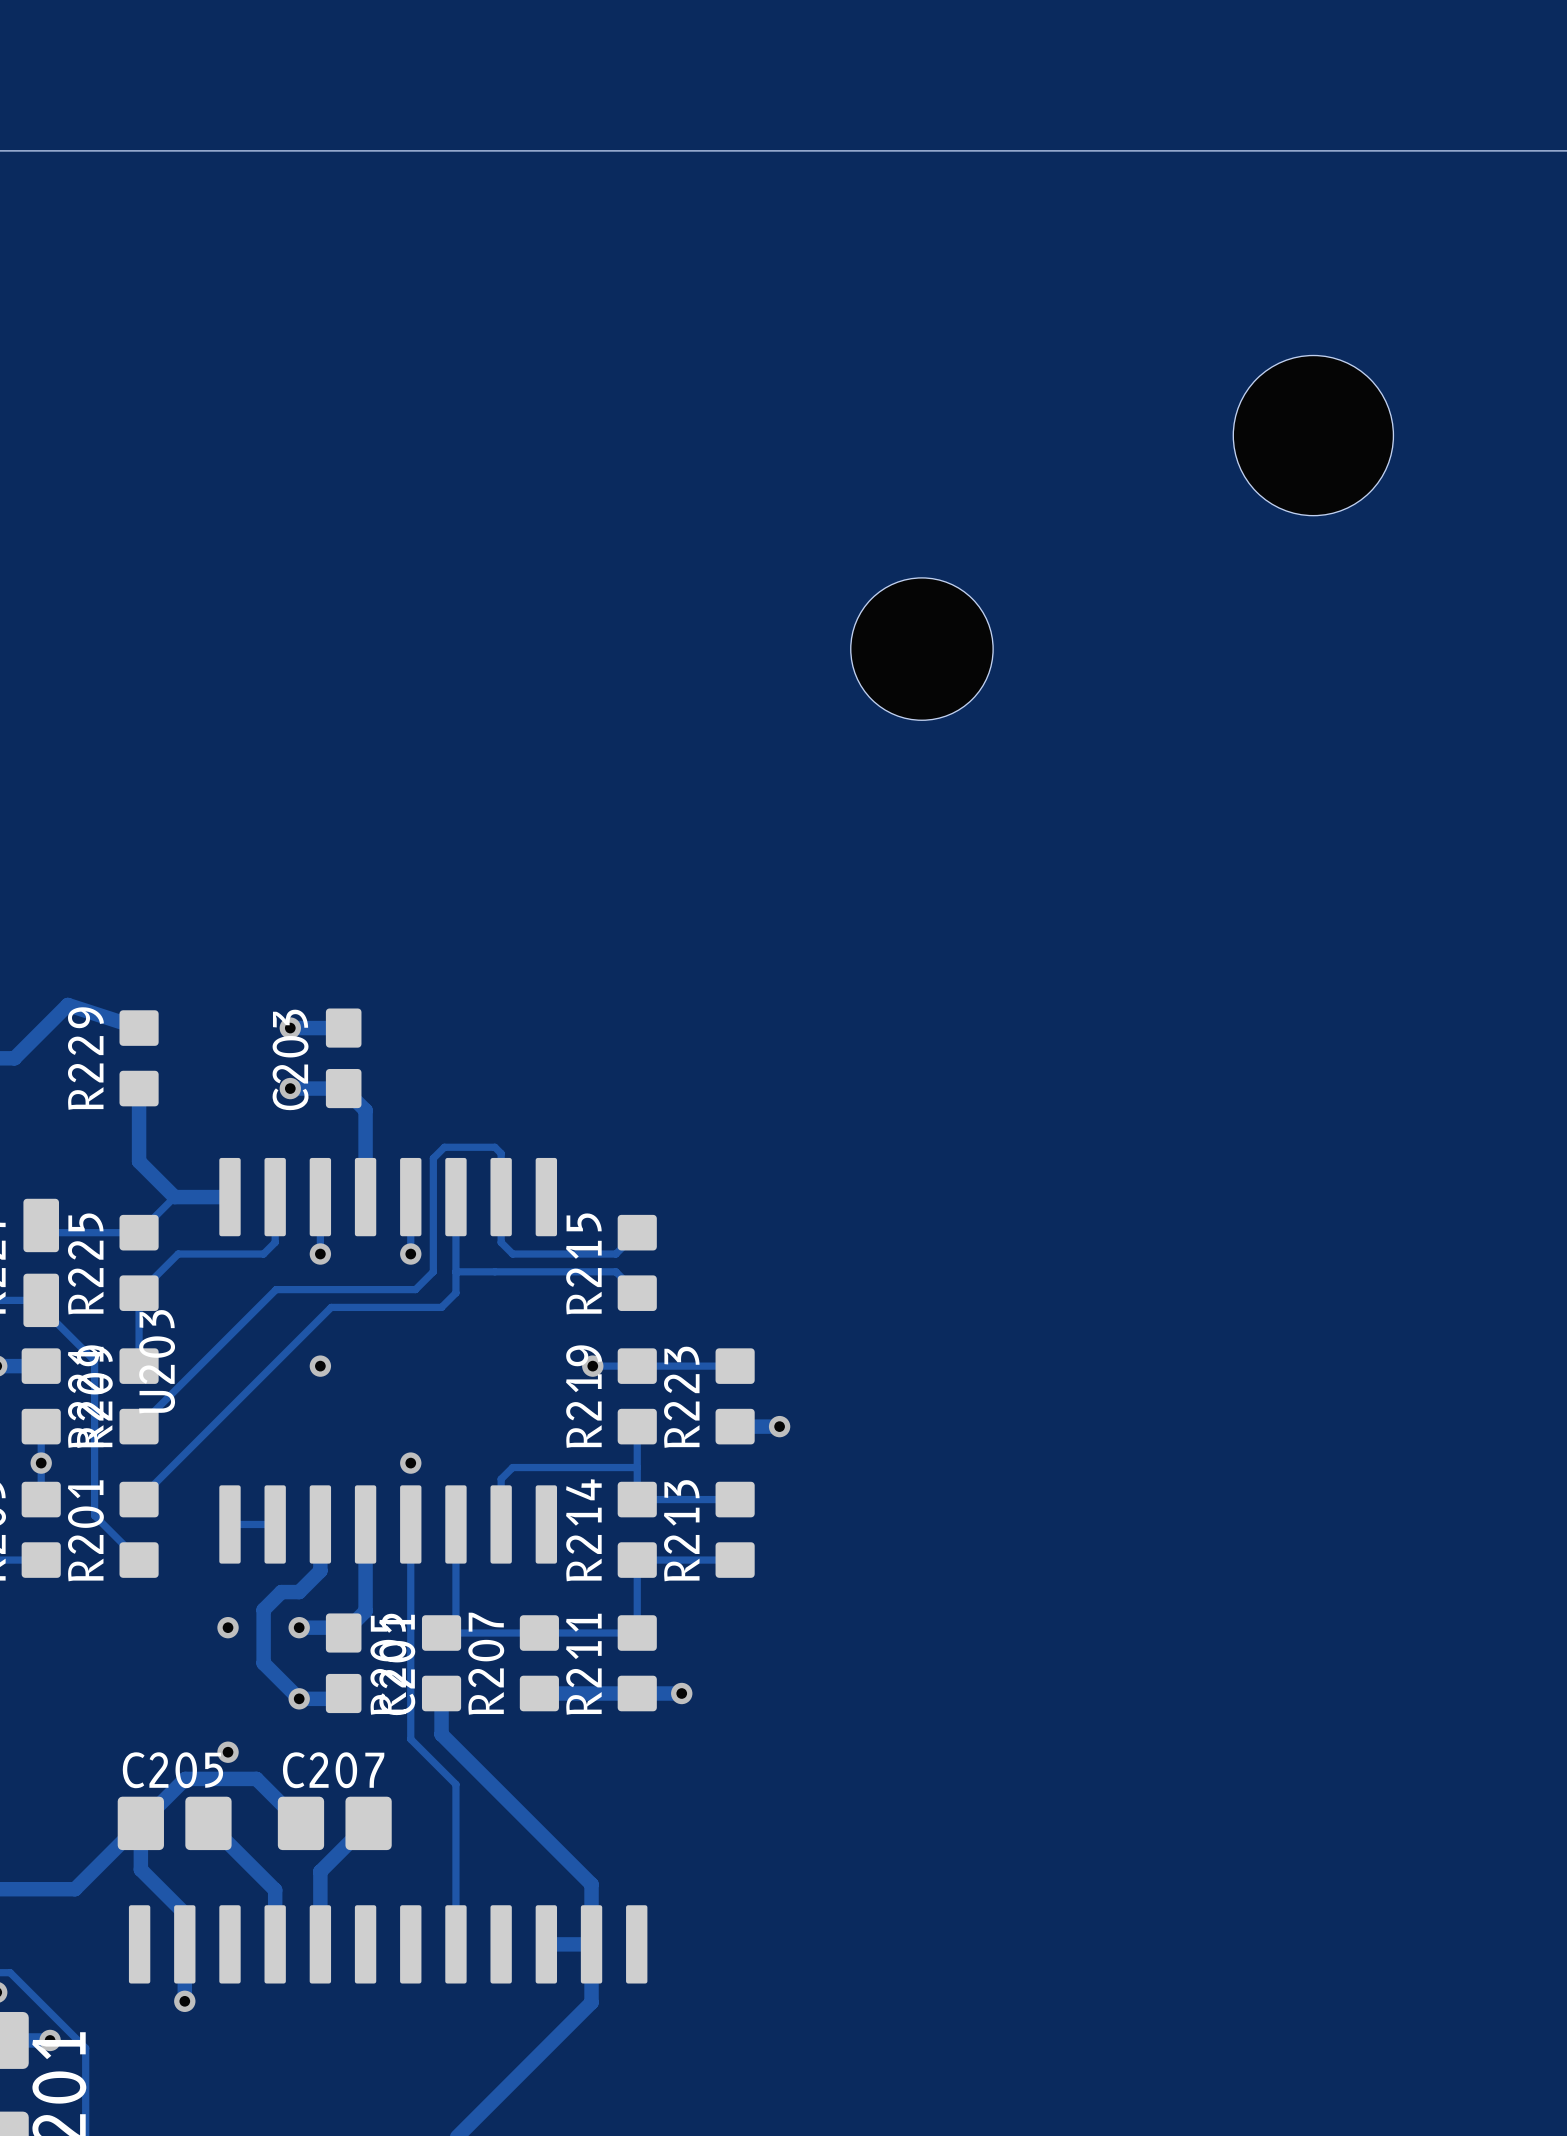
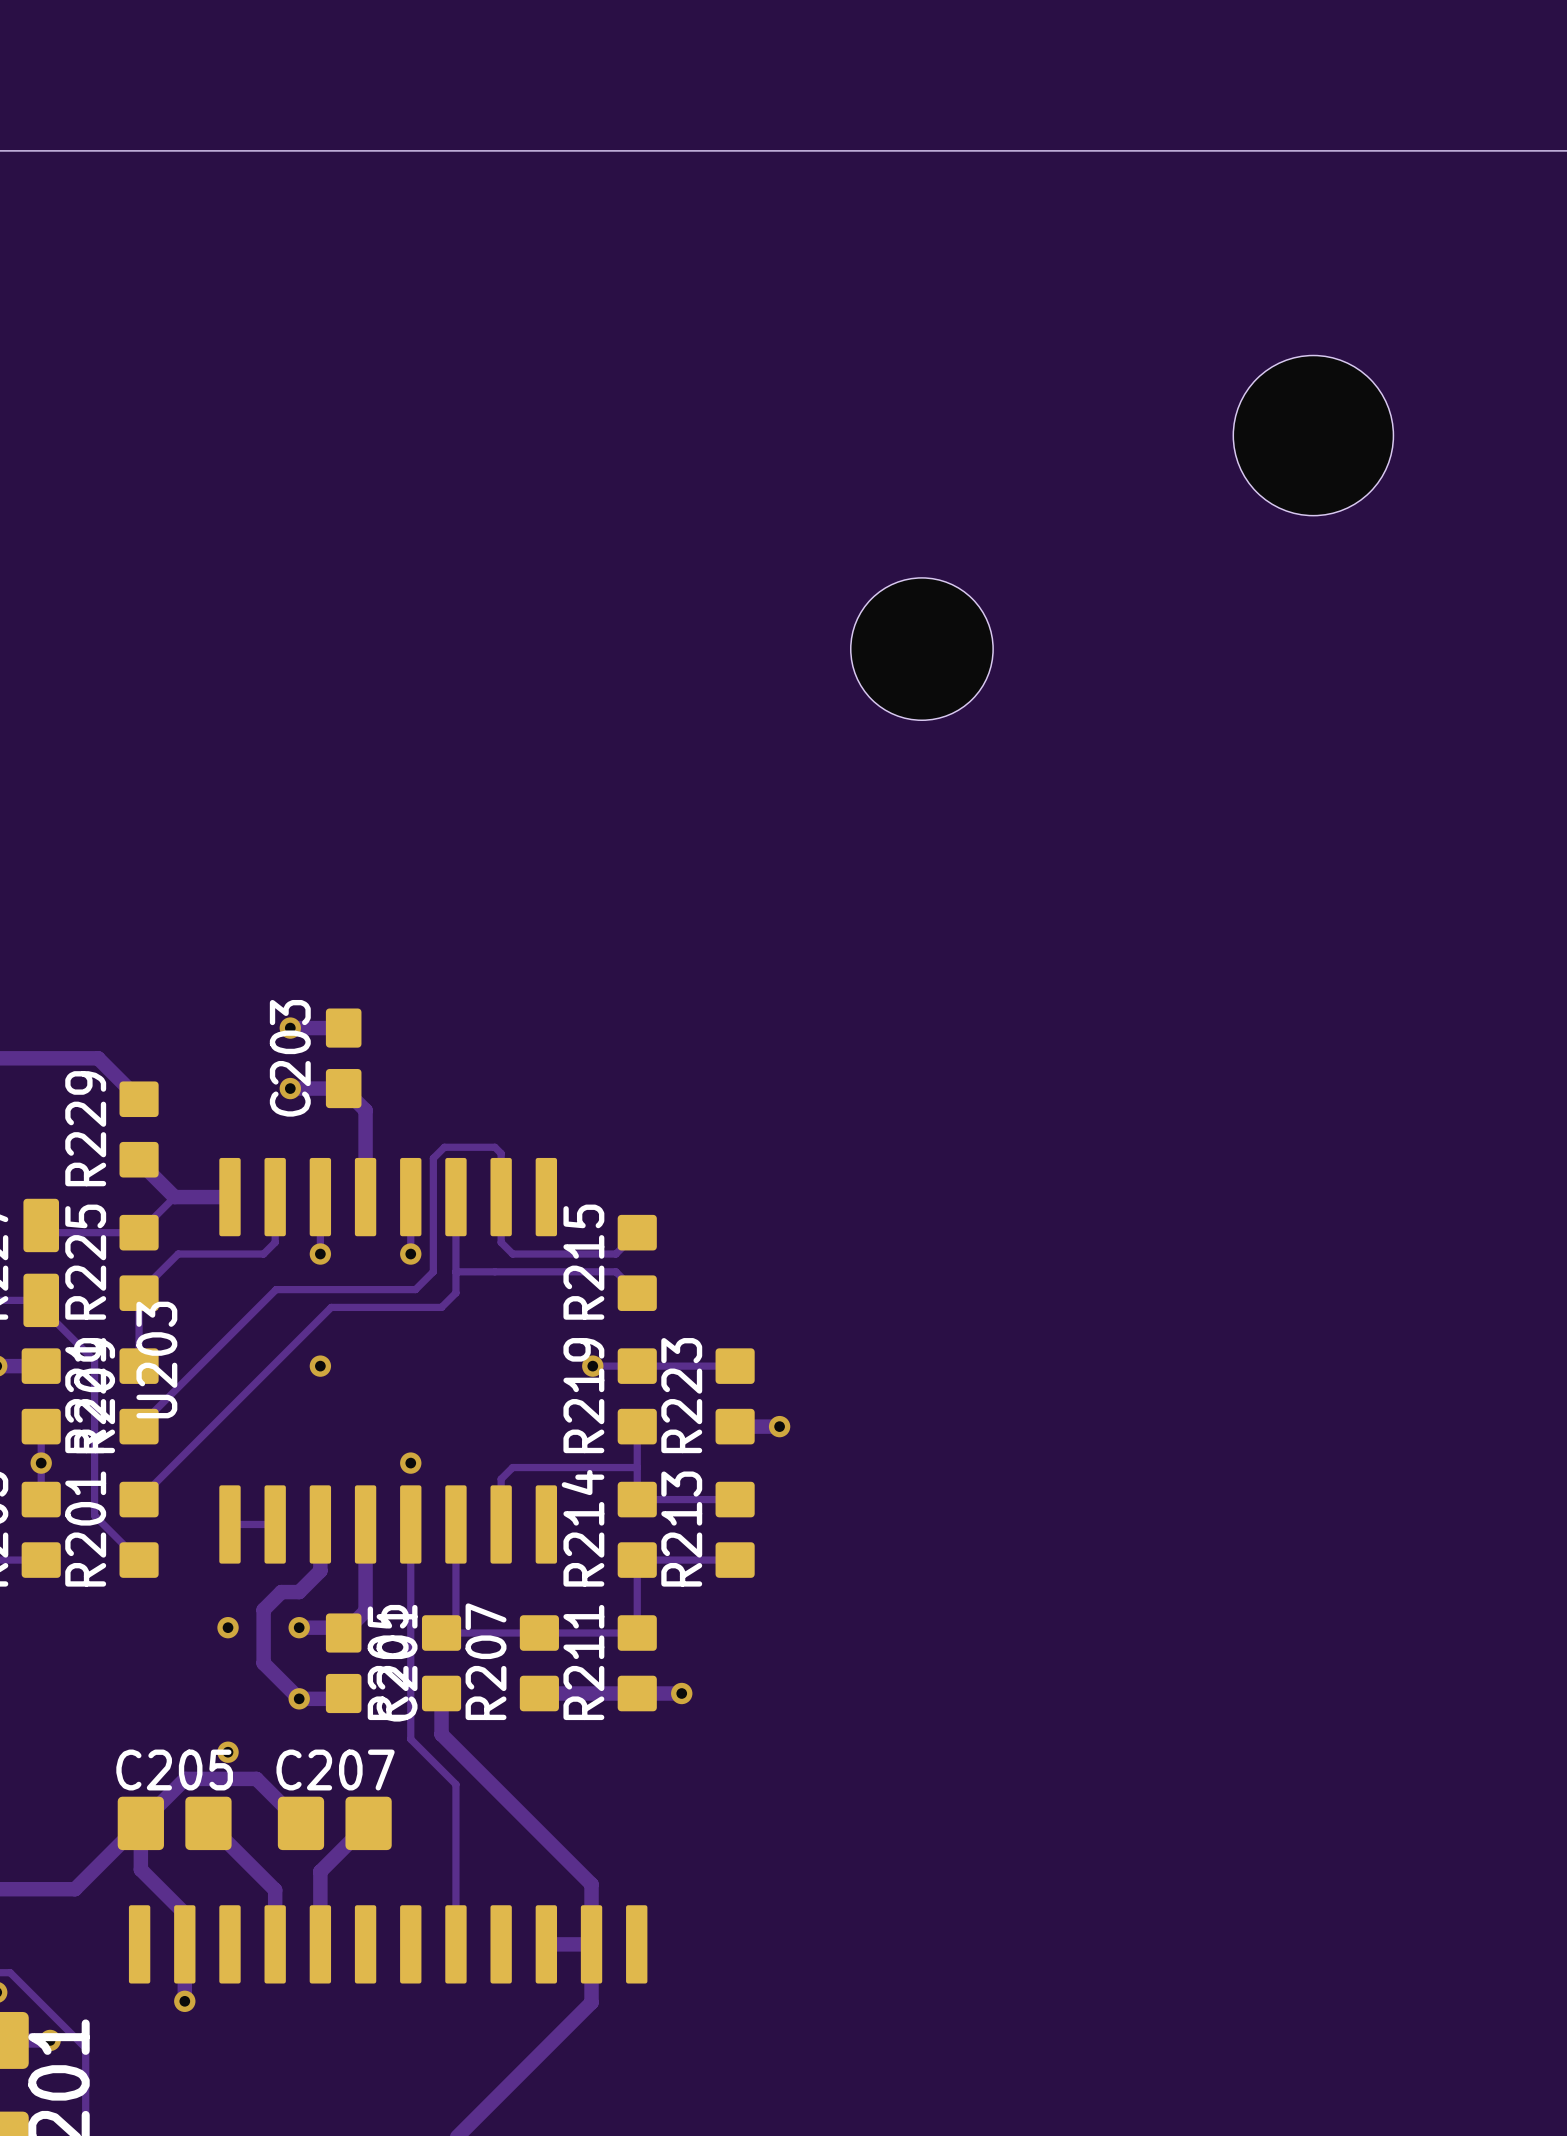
track: (139, 1028) (67, 1004) (14, 1058) -> (139, 1099) (98, 1058) (14, 1058)
R229 position: (139, 1058) -> (139, 1129)
track: (139, 1088) (139, 1159) -> none

